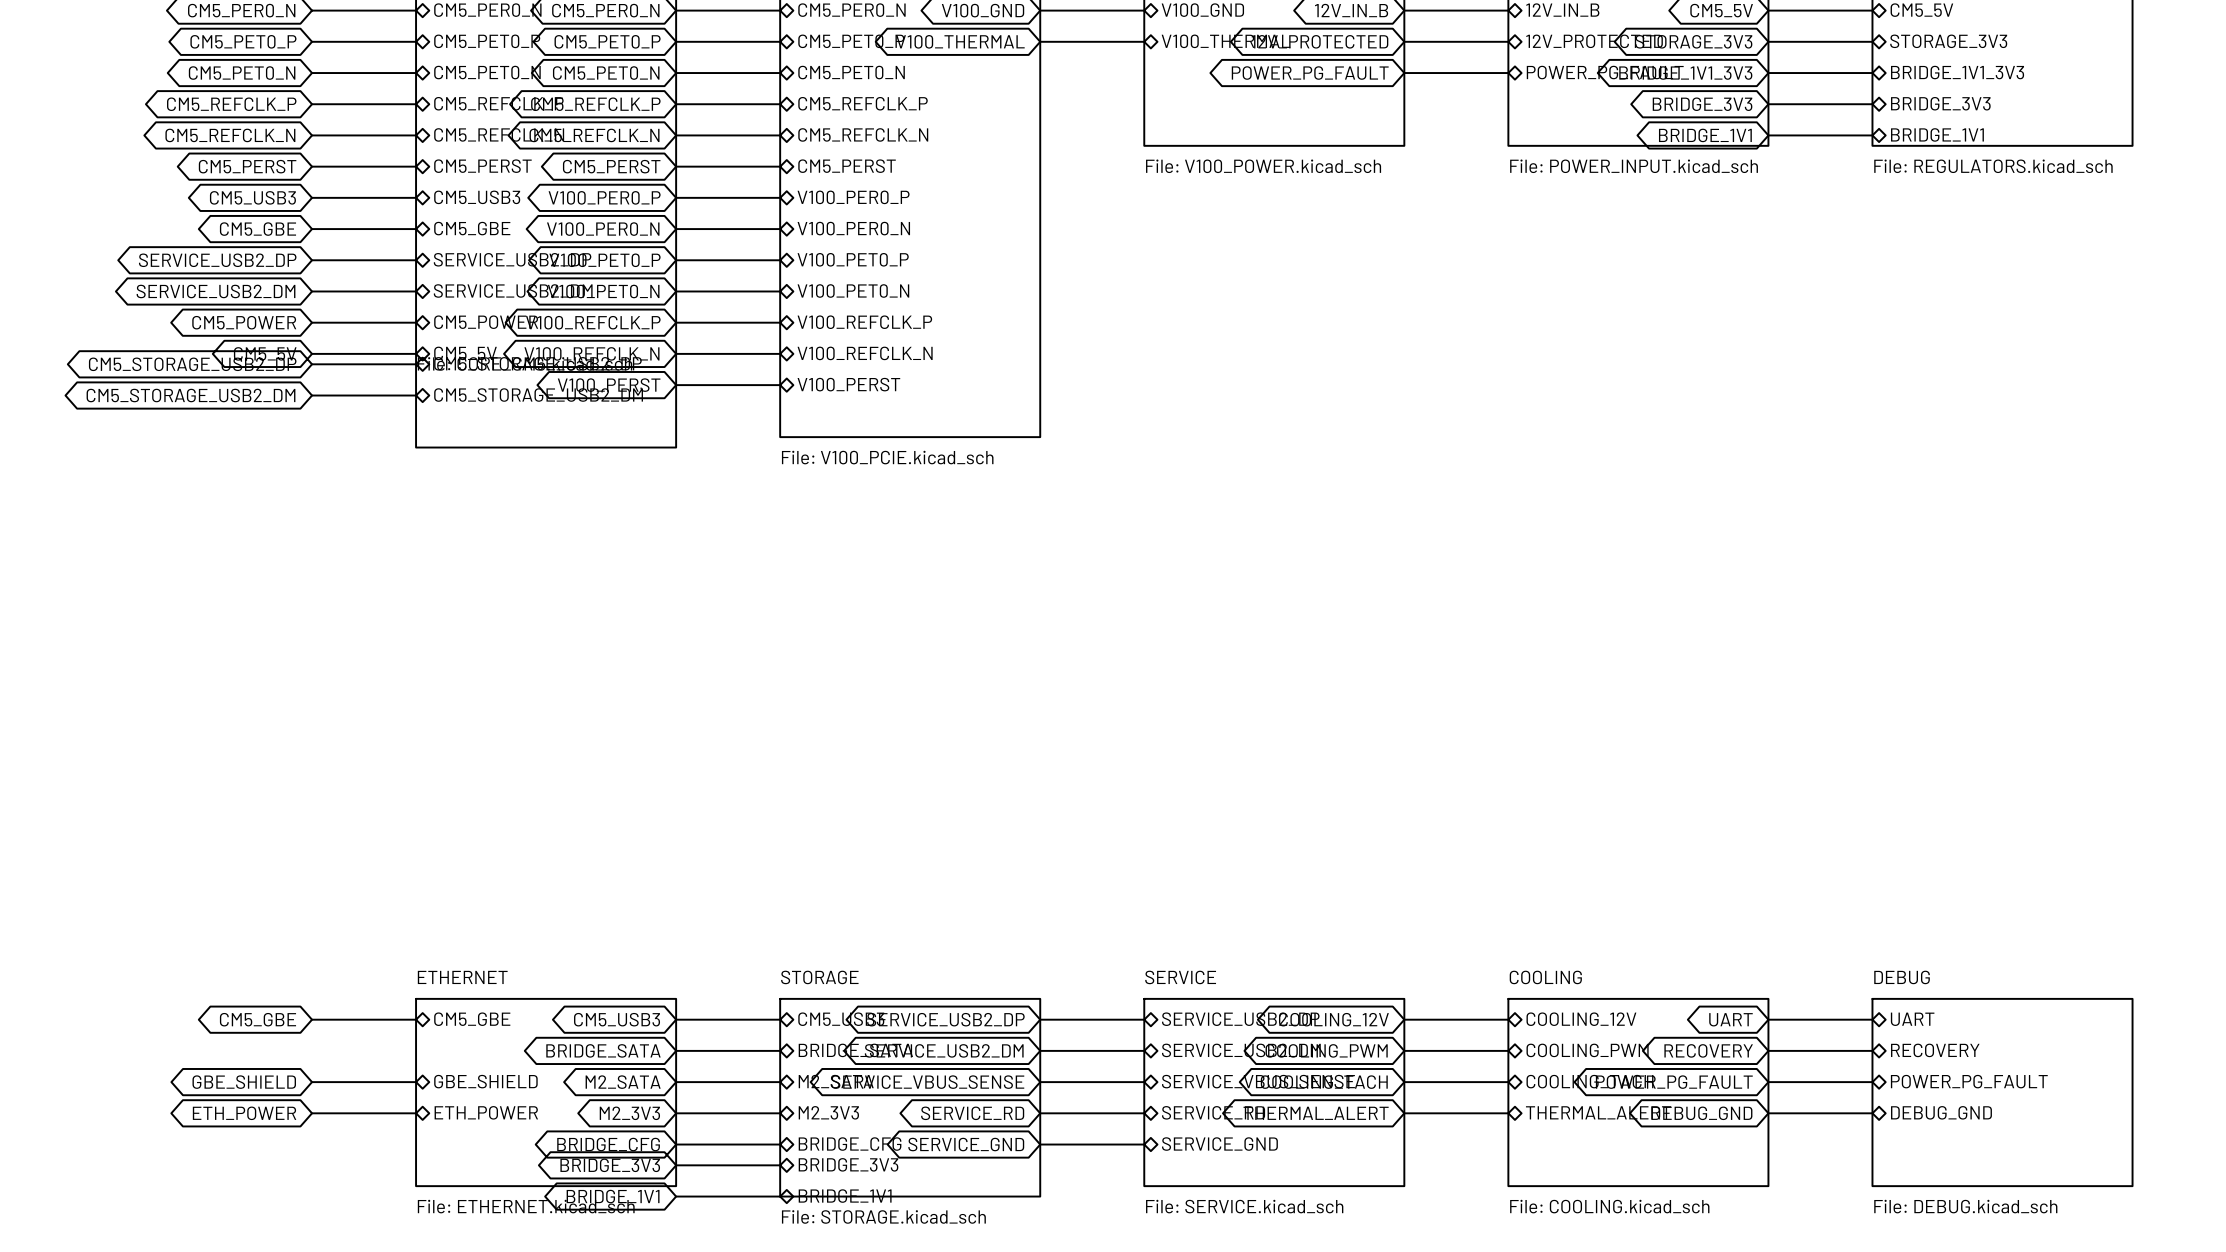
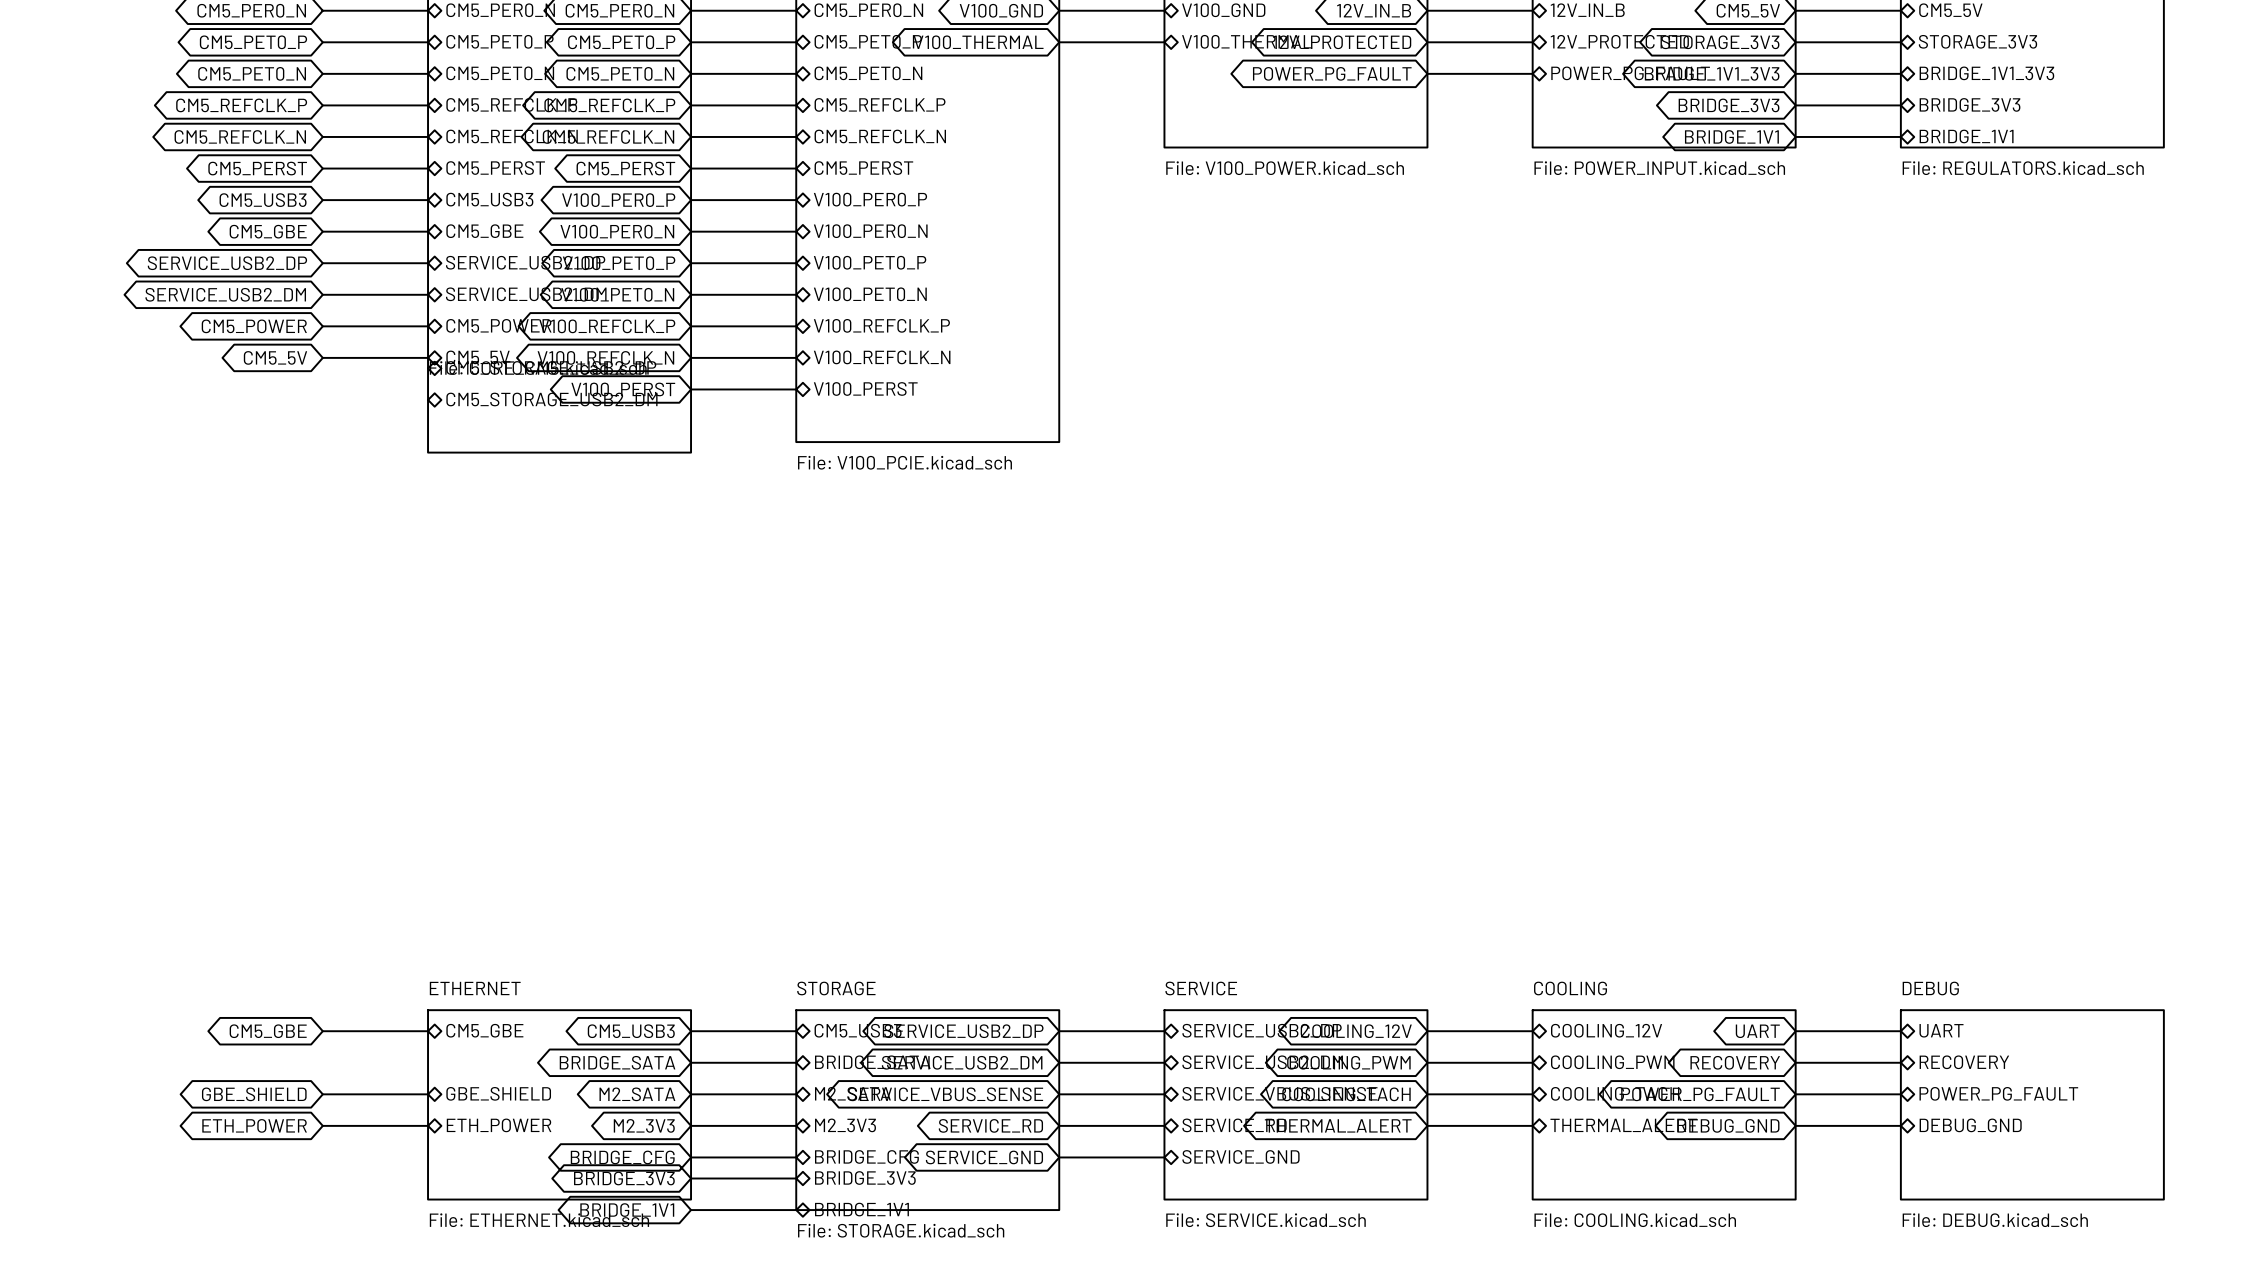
global label: CM5_STORAGE_USB2_DP (192, 364) -> none
wire: (312, 364) (416, 364) -> none
global label: CM5_STORAGE_USB2_DM (191, 395) -> none
wire: (312, 395) (416, 395) -> none

